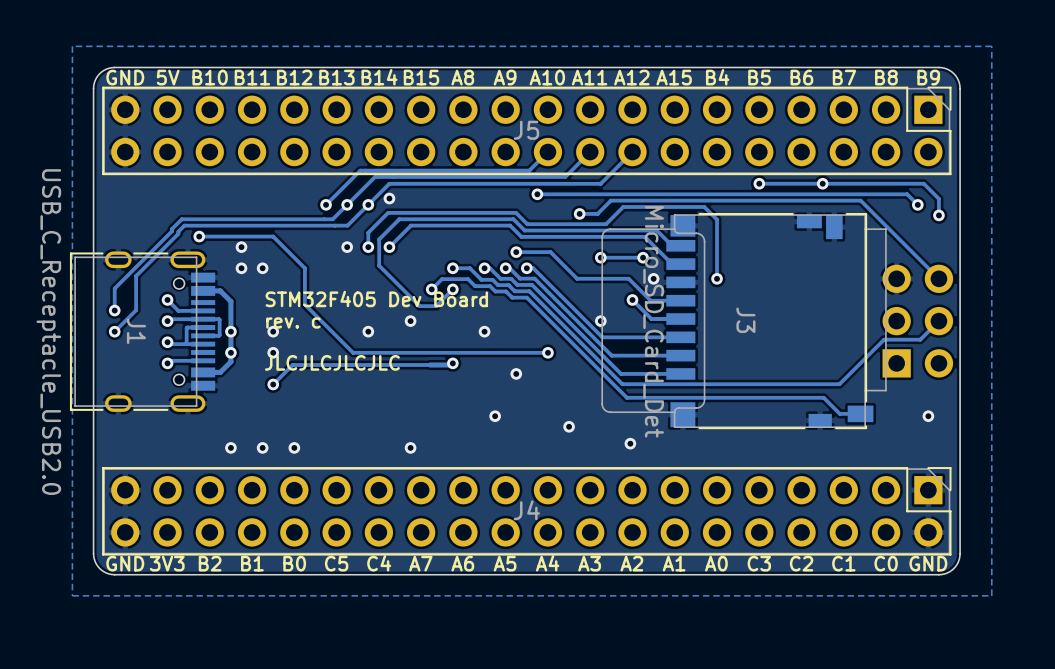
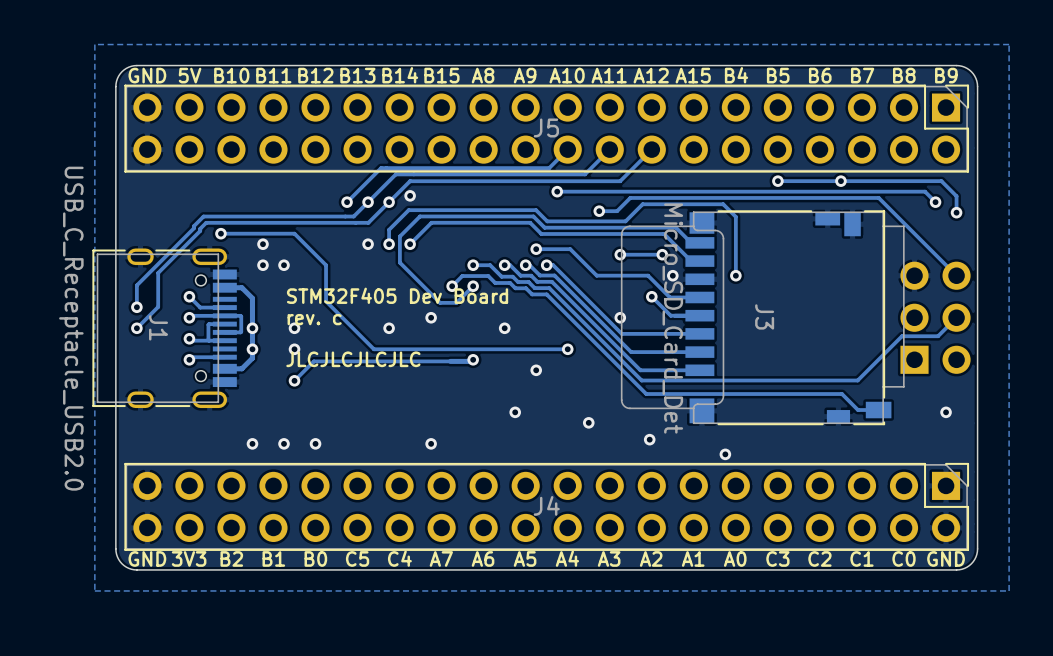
via: none -> (725, 454)

